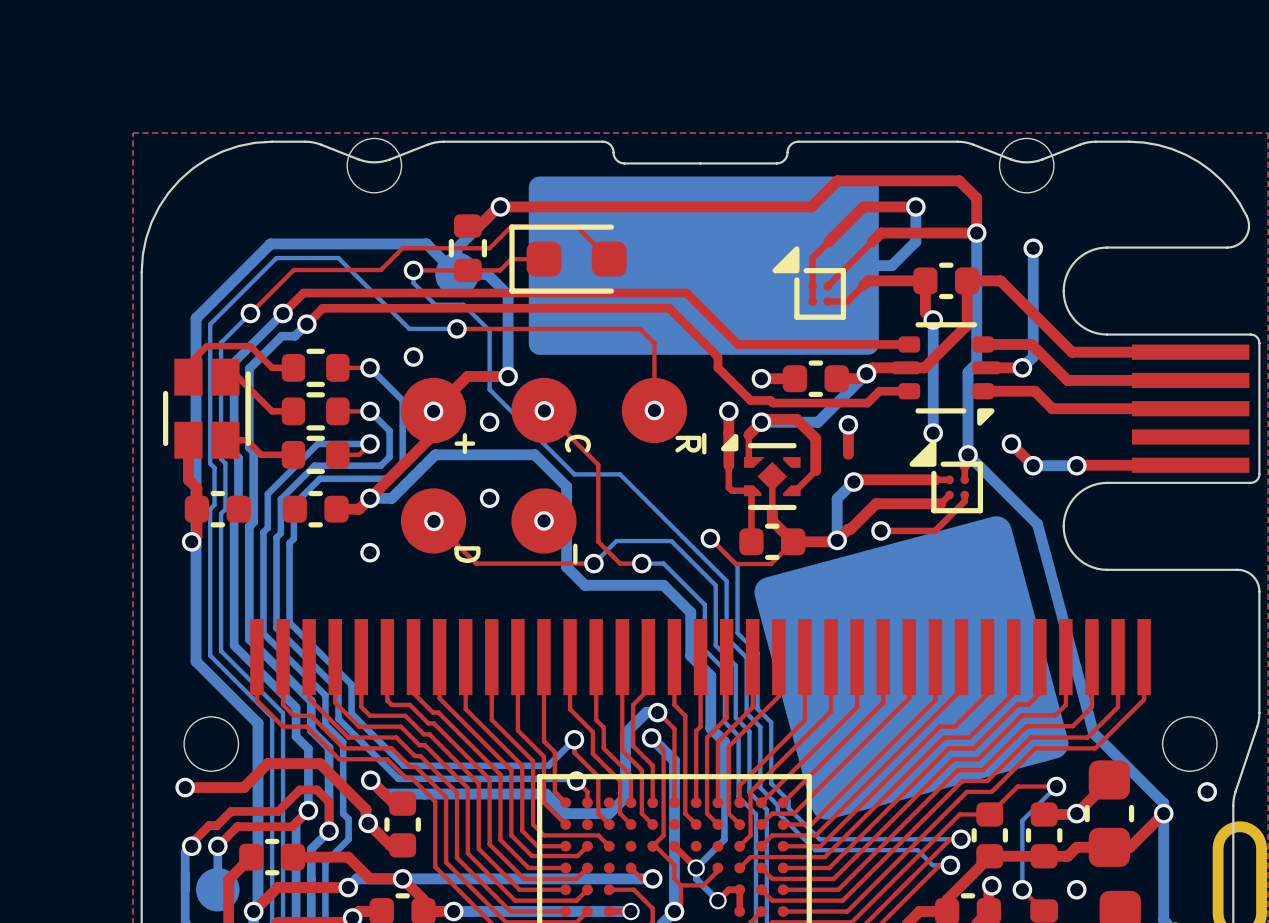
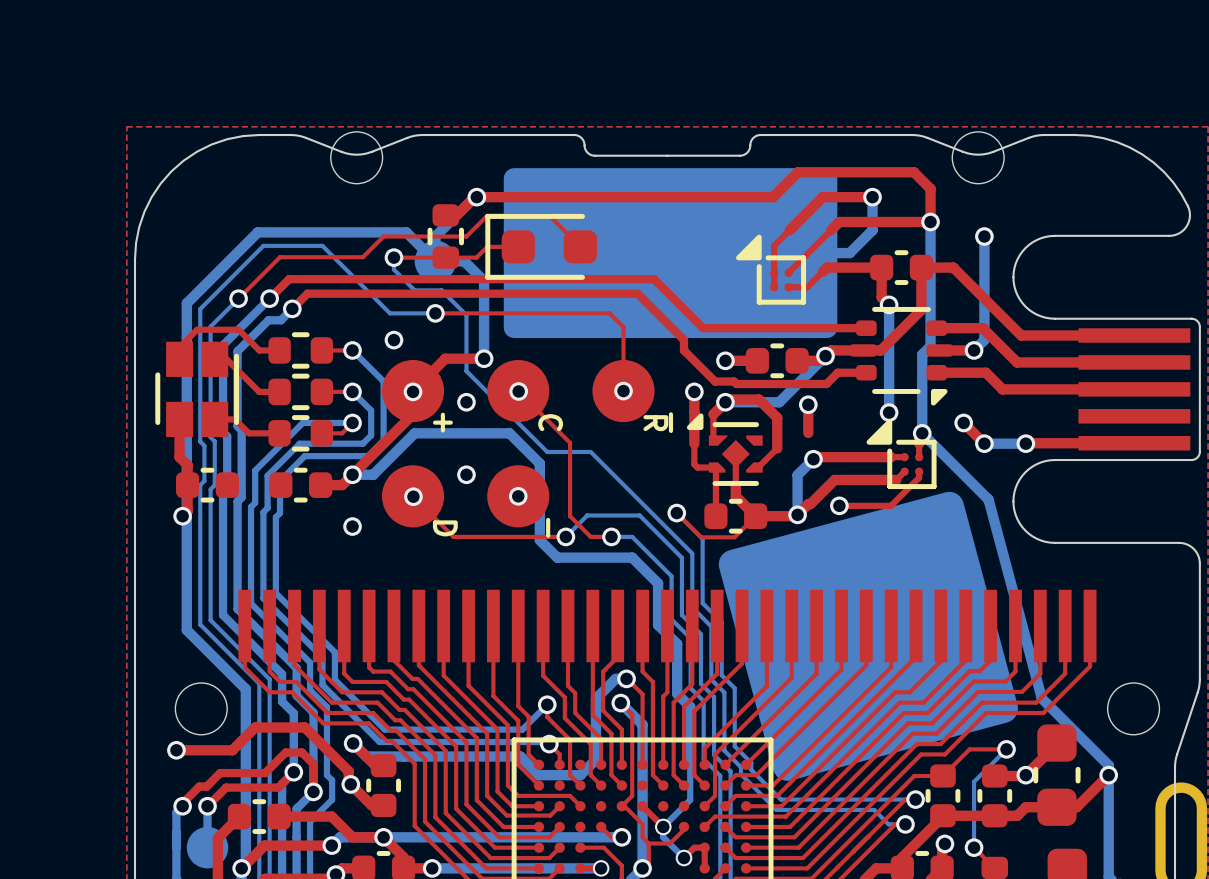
via: (1207, 791) -> none
via: (1076, 889) -> none

